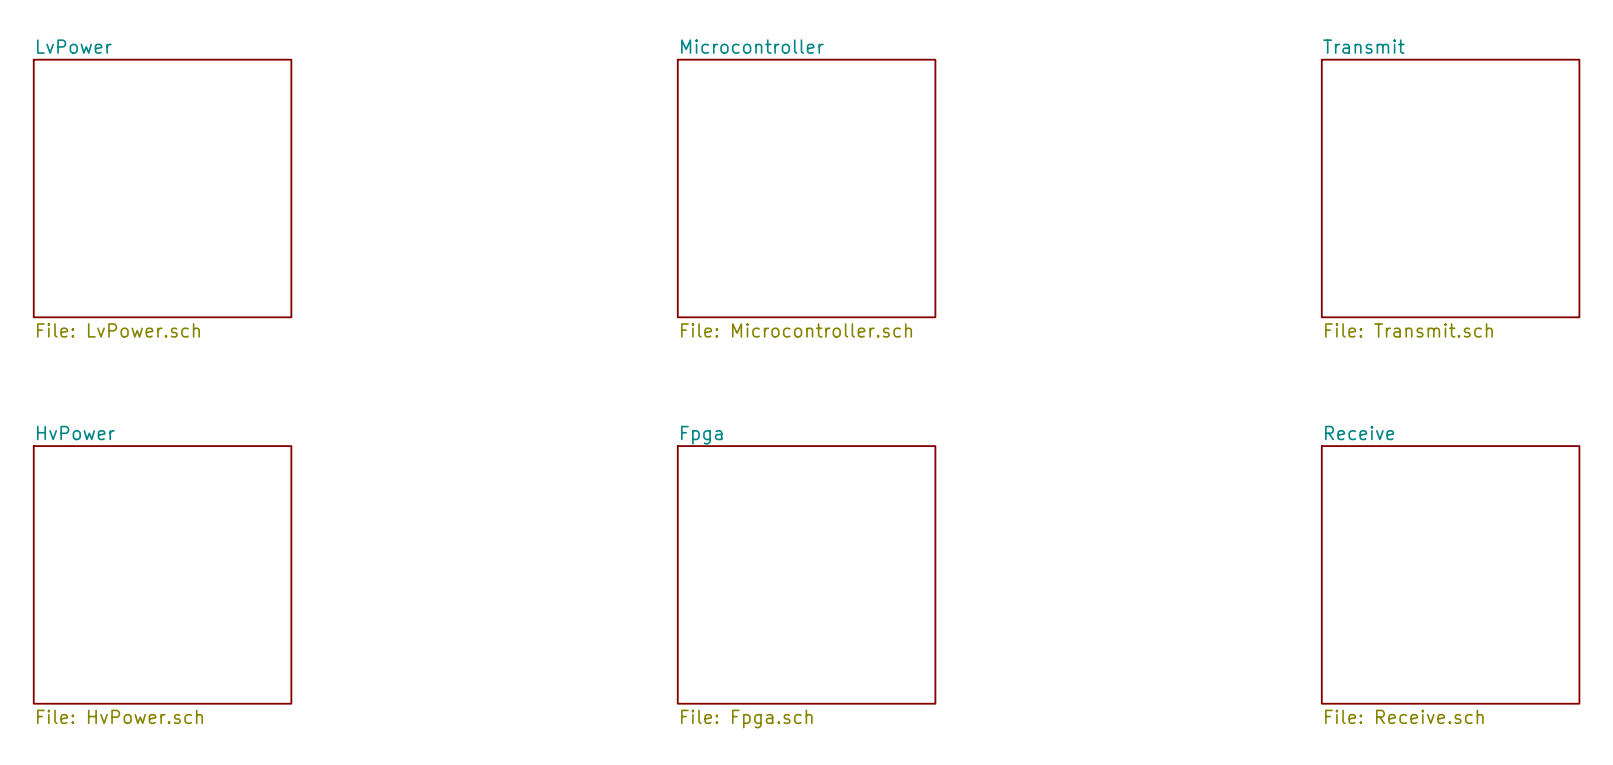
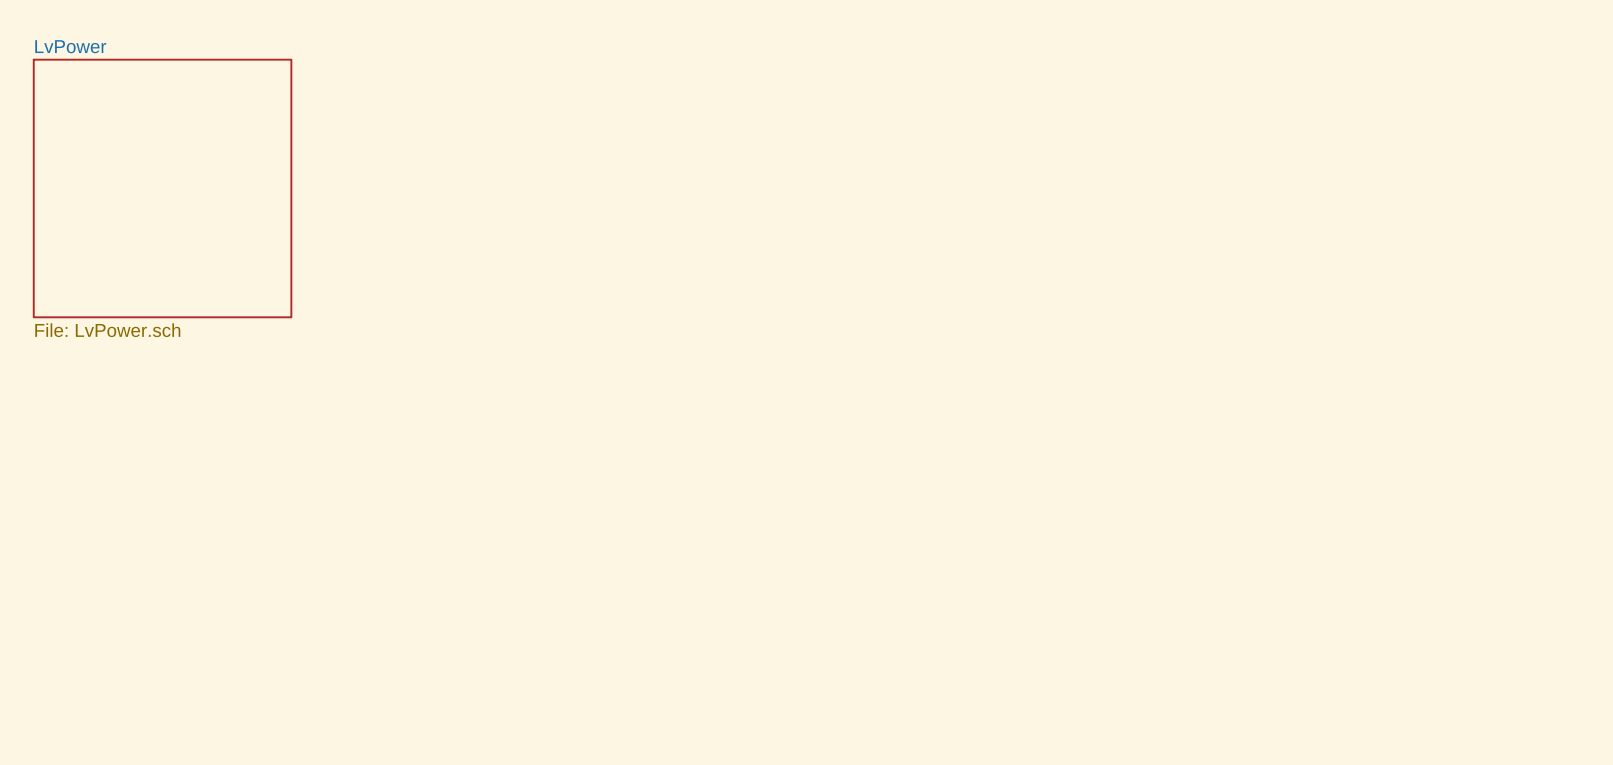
sheet Microcontroller: File: Microcontroller.sch (806, 188) -> none
sheet Transmit: File: Transmit.sch (1450, 188) -> none
sheet HvPower: File: HvPower.sch (162, 574) -> none
sheet Fpga: File: Fpga.sch (806, 574) -> none
sheet Receive: File: Receive.sch (1450, 574) -> none

